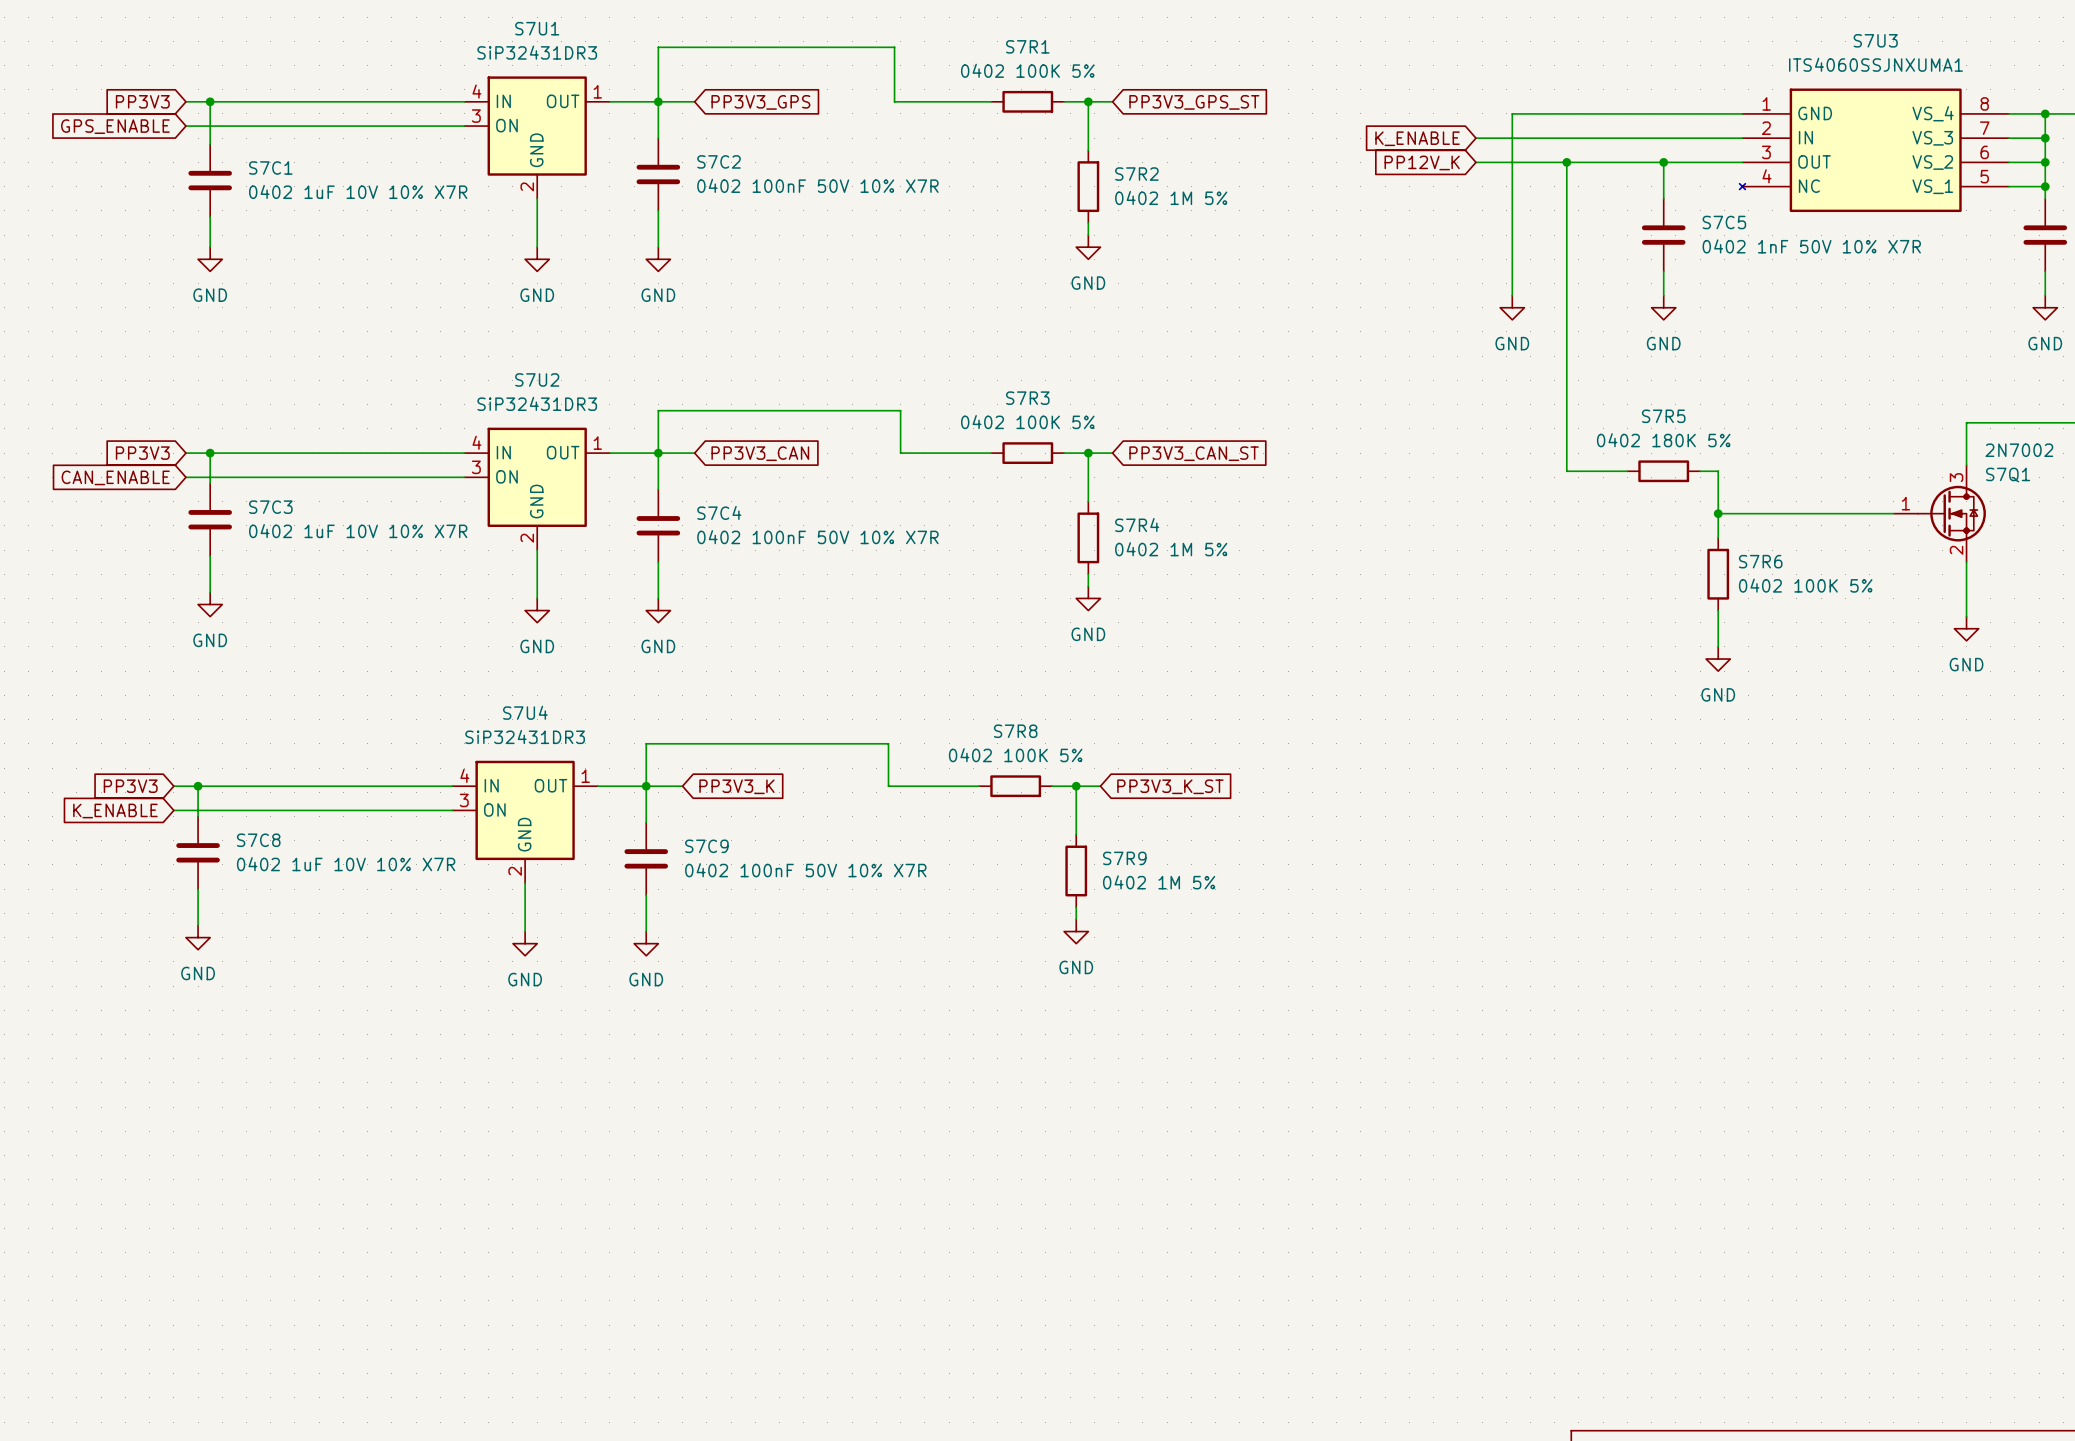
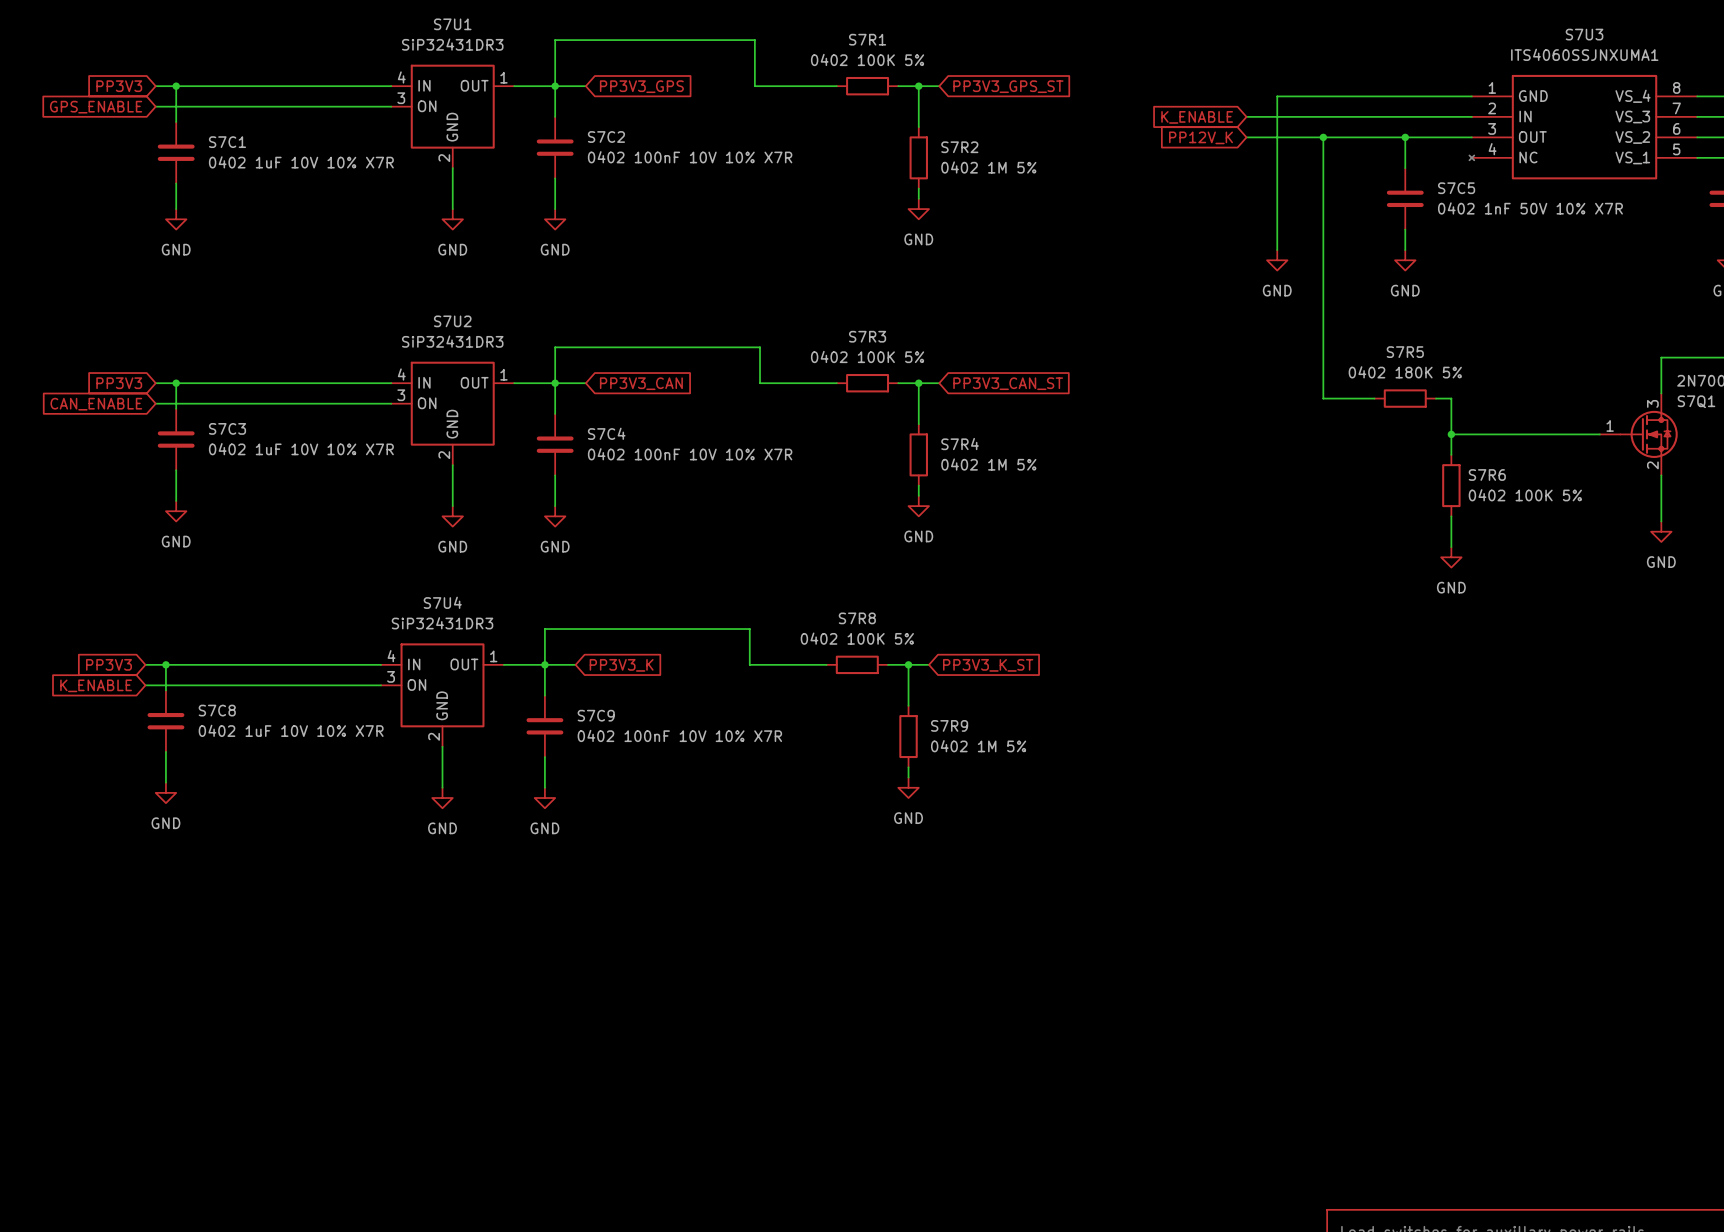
S7C2 value: 0402 100nF 50V 10% X7R (817, 185) -> 0402 100nF 10V 10% X7R (690, 157)
S7C4 value: 0402 100nF 50V 10% X7R (817, 537) -> 0402 100nF 10V 10% X7R (690, 454)
S7C9 value: 0402 100nF 50V 10% X7R (805, 870) -> 0402 100nF 10V 10% X7R (679, 735)

